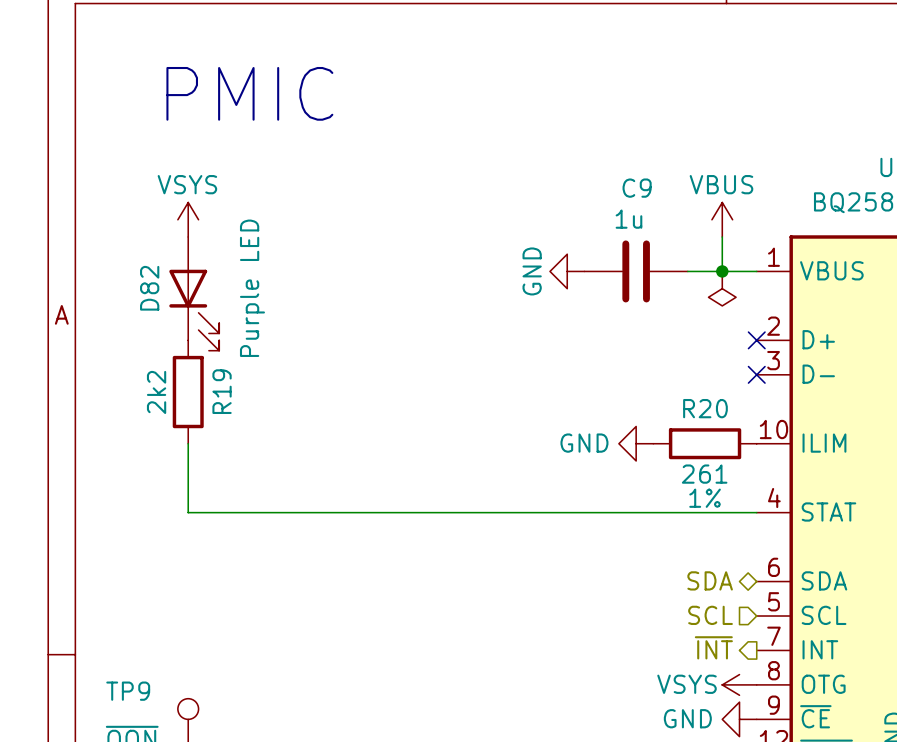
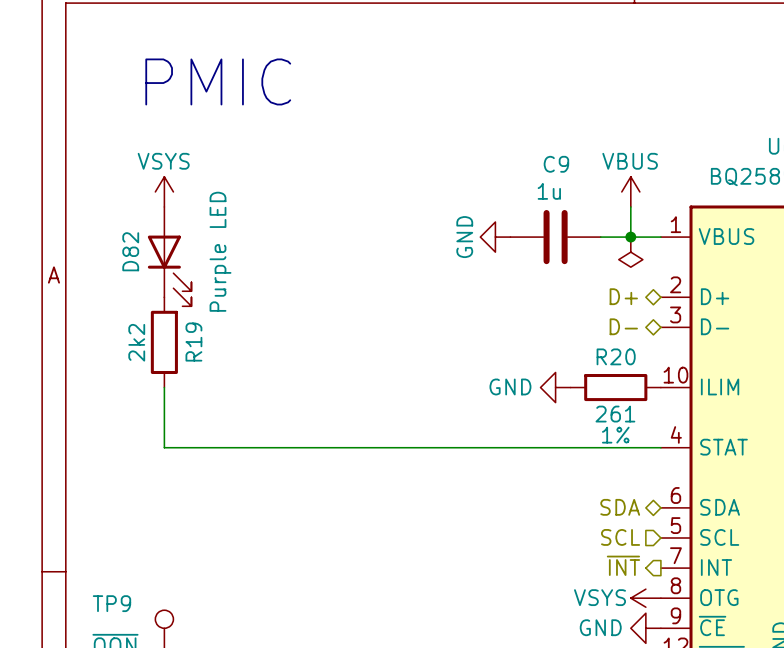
hierarchical label: none -> D+ (623, 296)
no-connect mark: (756, 340) -> none
hierarchical label: none -> D- (623, 326)
no-connect mark: (756, 374) -> none

